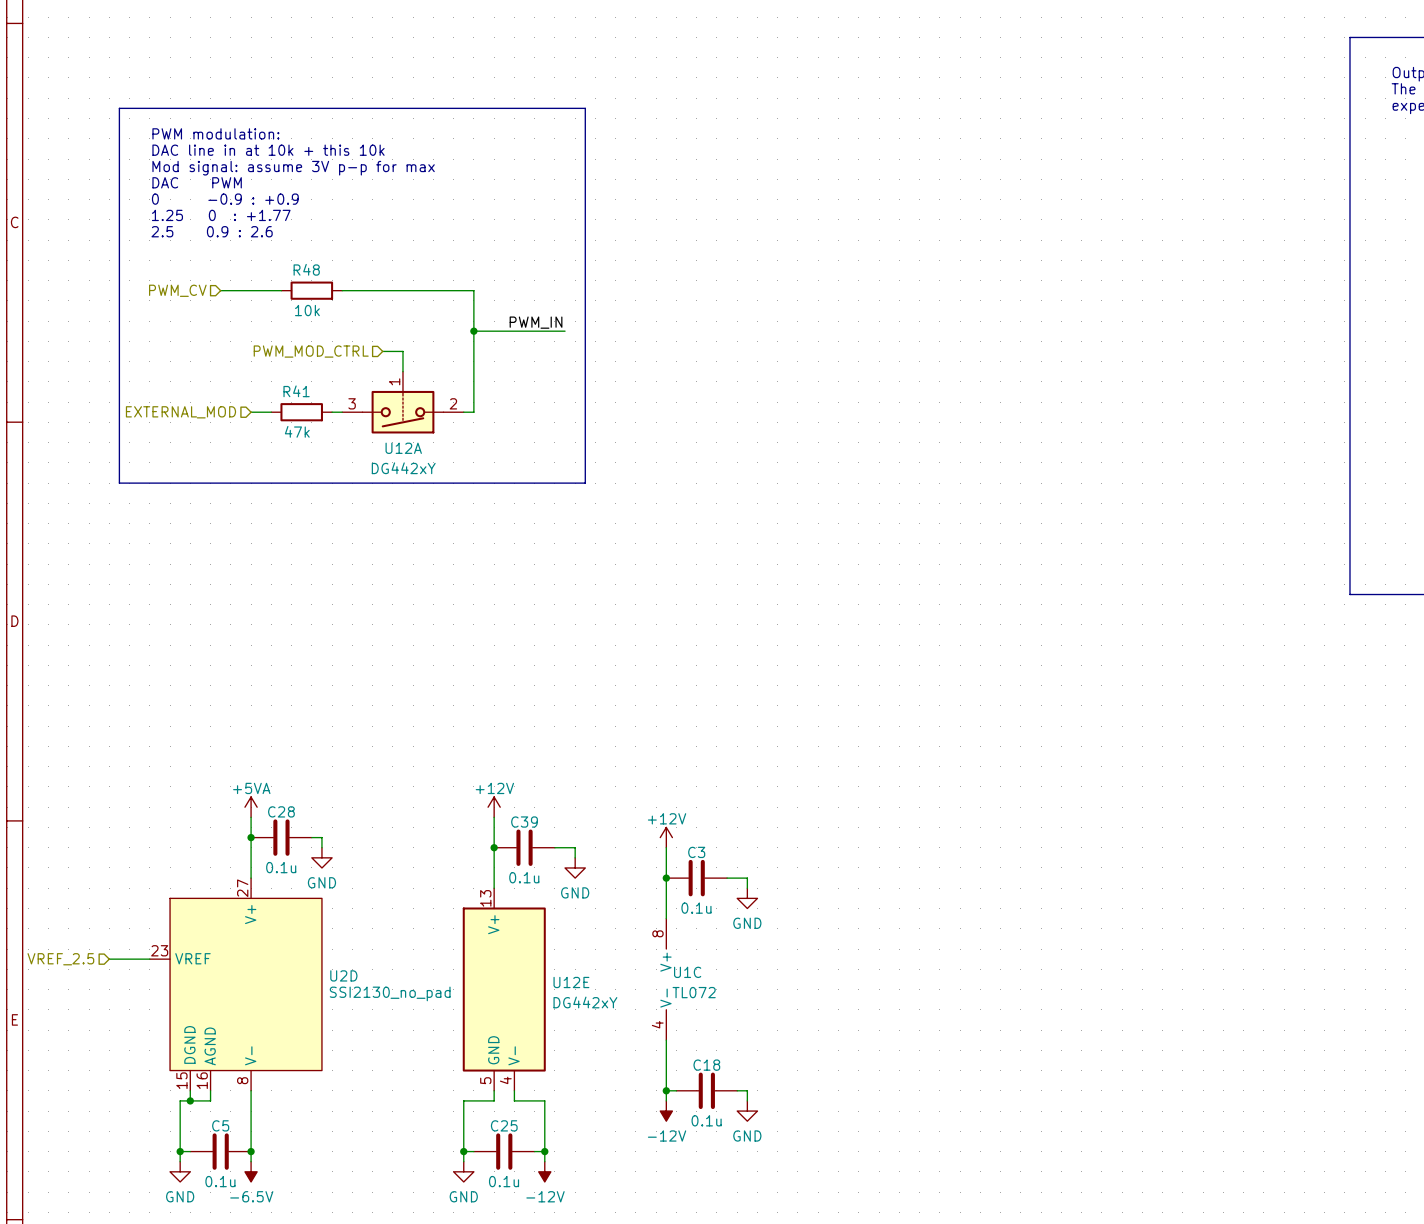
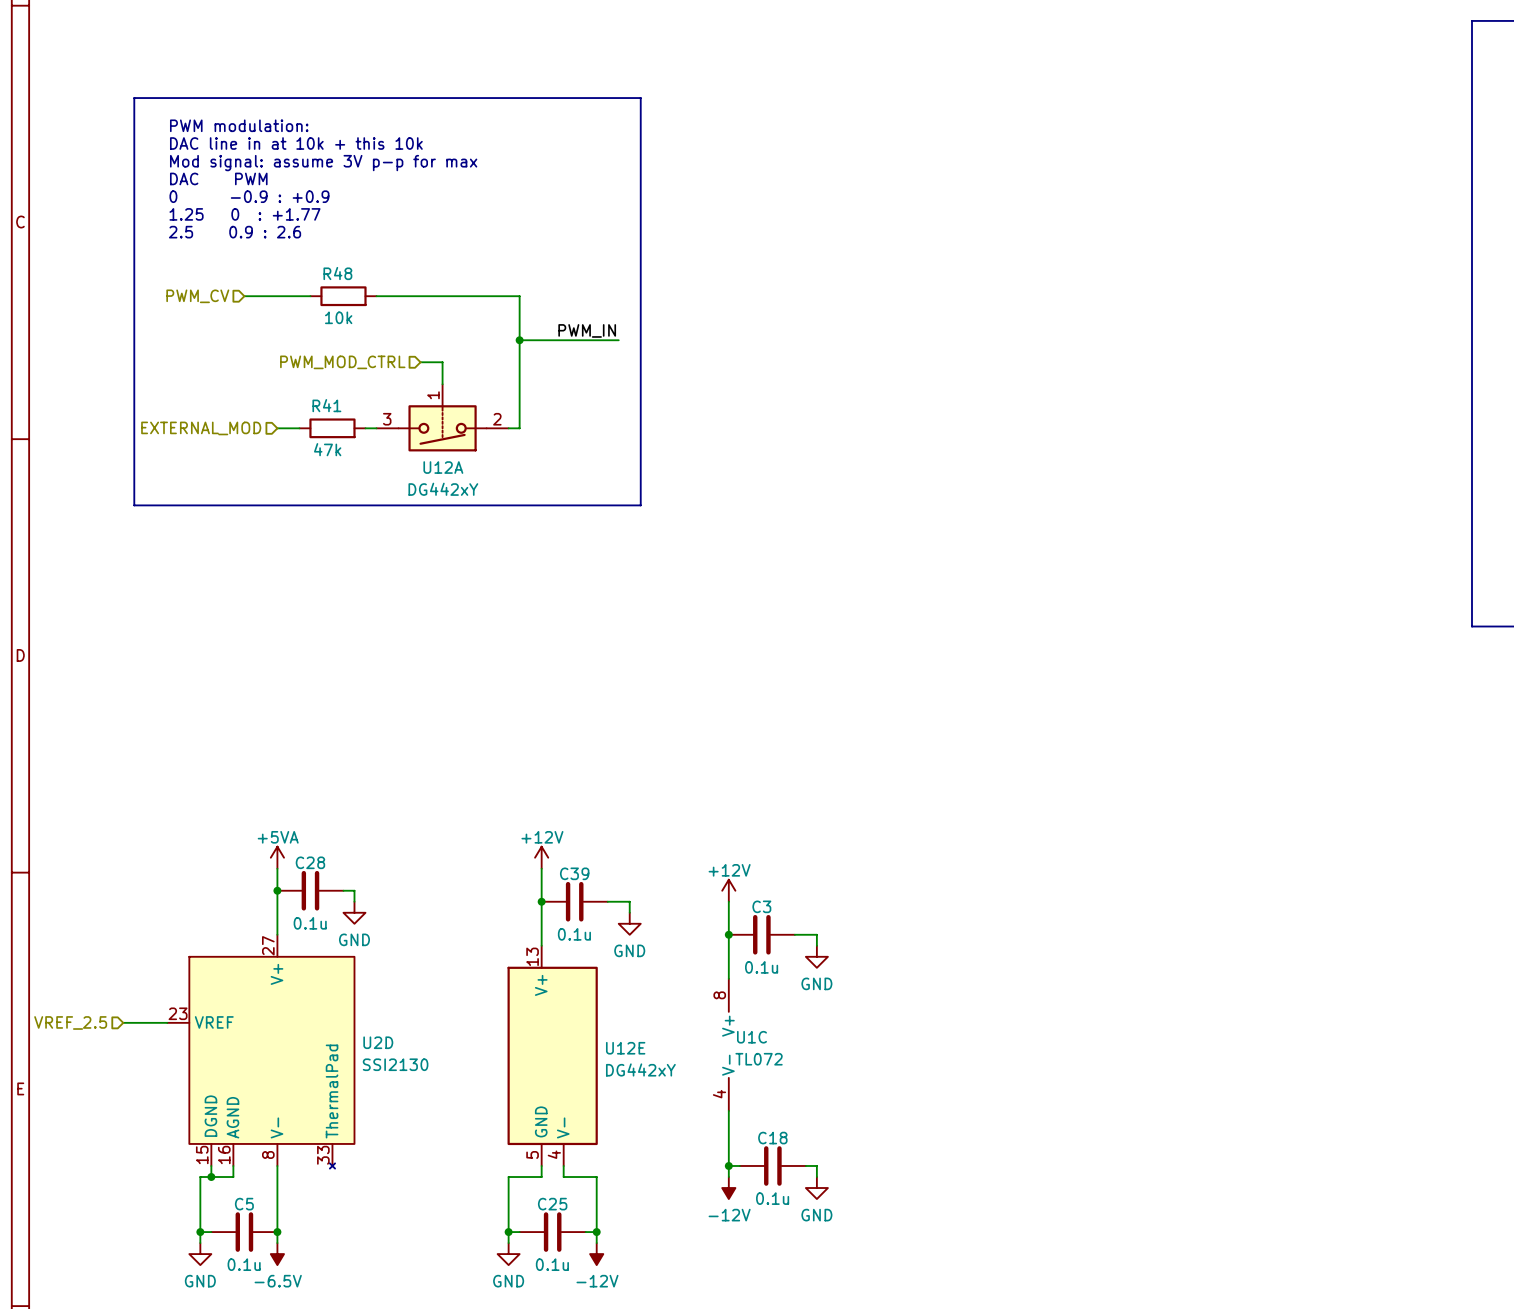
U2D symbol: [149, 878, 323, 1091] -> [167, 934, 356, 1169]
U2D value: SSI2130_no_pad (390, 993) -> SSI2130 (395, 1064)

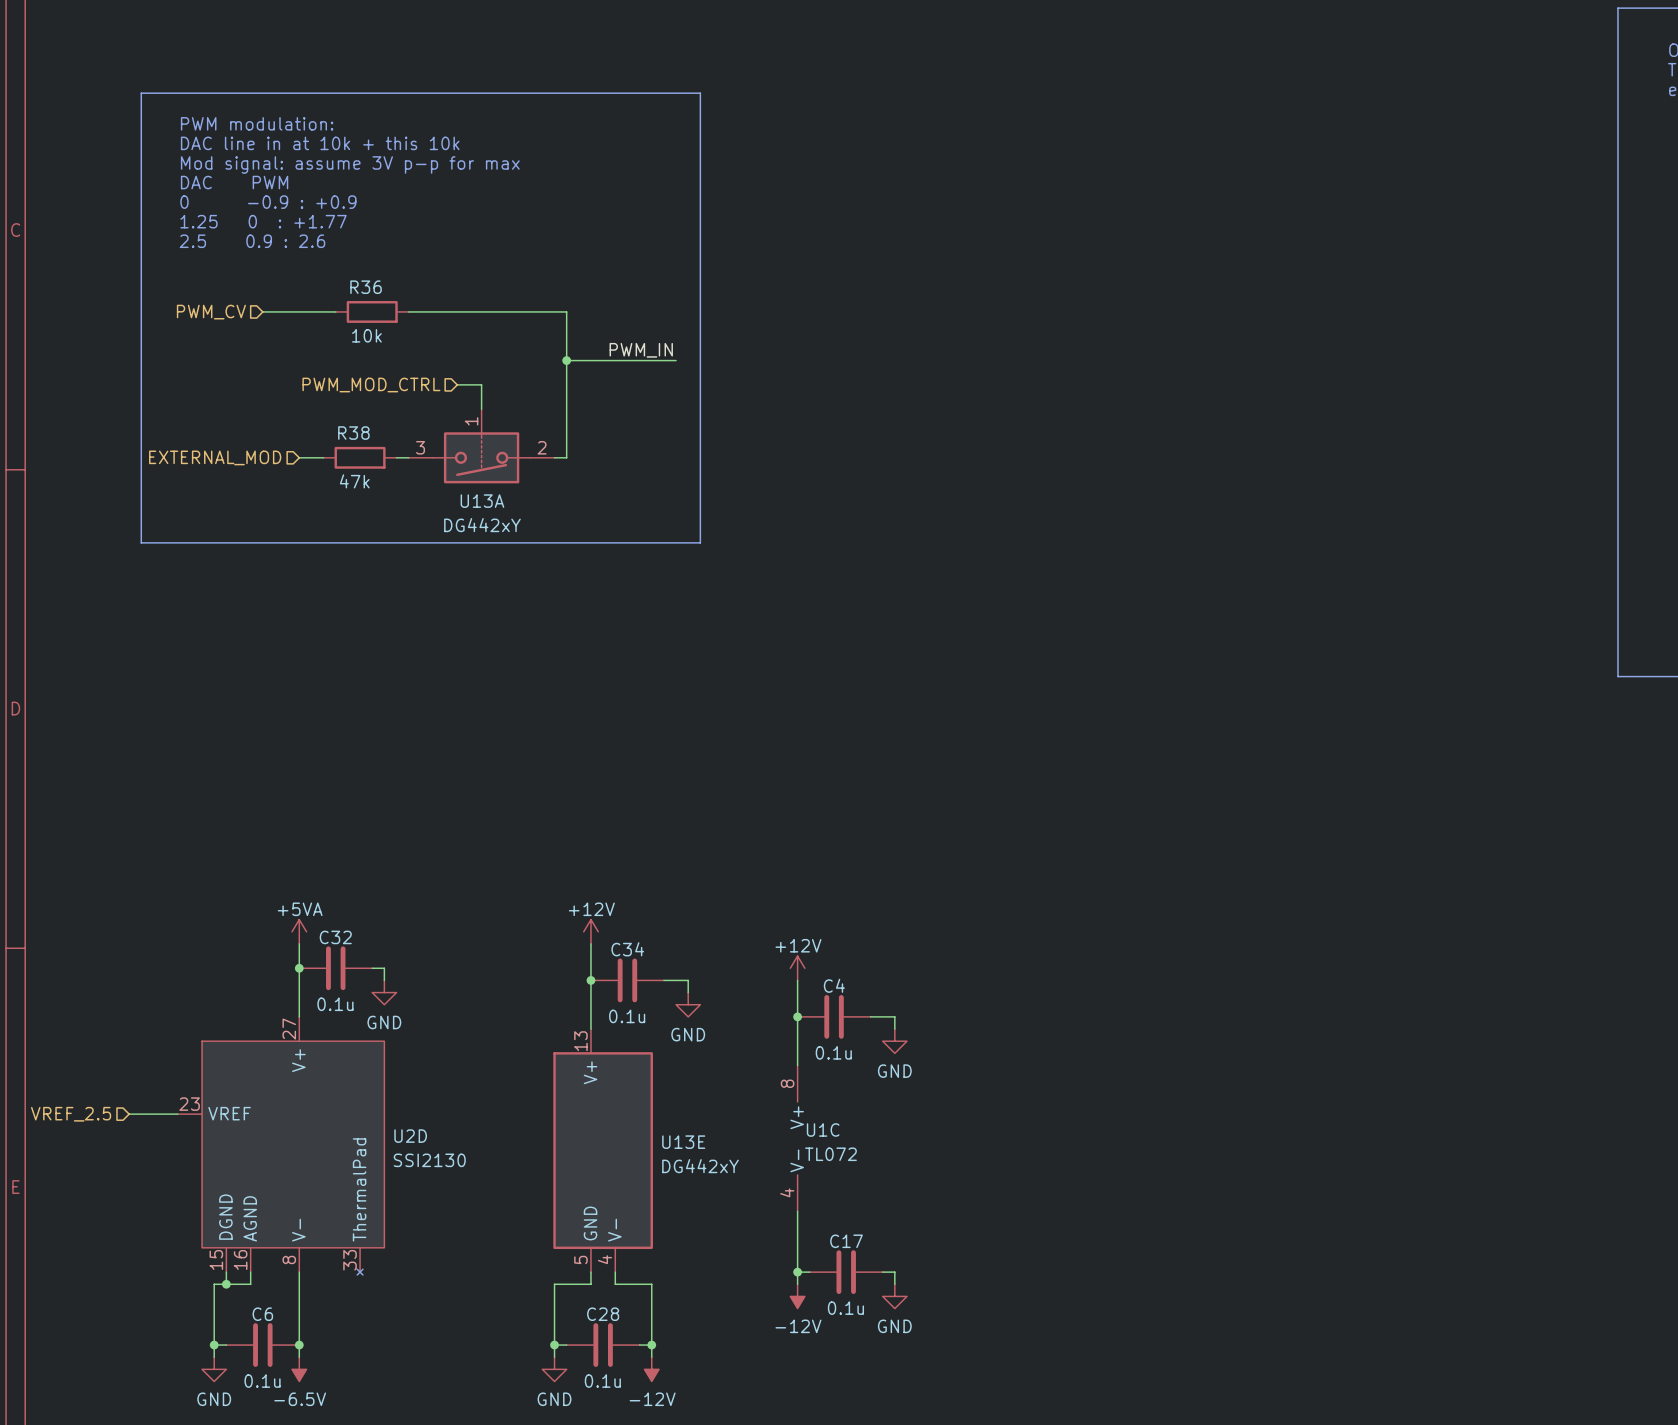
R48 name: R48 (337, 273) -> R36 (366, 287)
R41 name: R41 (326, 405) -> R38 (353, 433)
U12A name: U12A (443, 467) -> U13A (482, 501)
C28 name: C28 (310, 862) -> C32 (335, 937)
C39 name: C39 (574, 873) -> C34 (627, 949)
C3 name: C3 (761, 906) -> C4 (834, 985)
U12E name: U12E (625, 1048) -> U13E (683, 1142)
C18 name: C18 (772, 1138) -> C17 (846, 1241)
C5 name: C5 (244, 1204) -> C6 (262, 1314)
C25 name: C25 (552, 1204) -> C28 (603, 1314)

